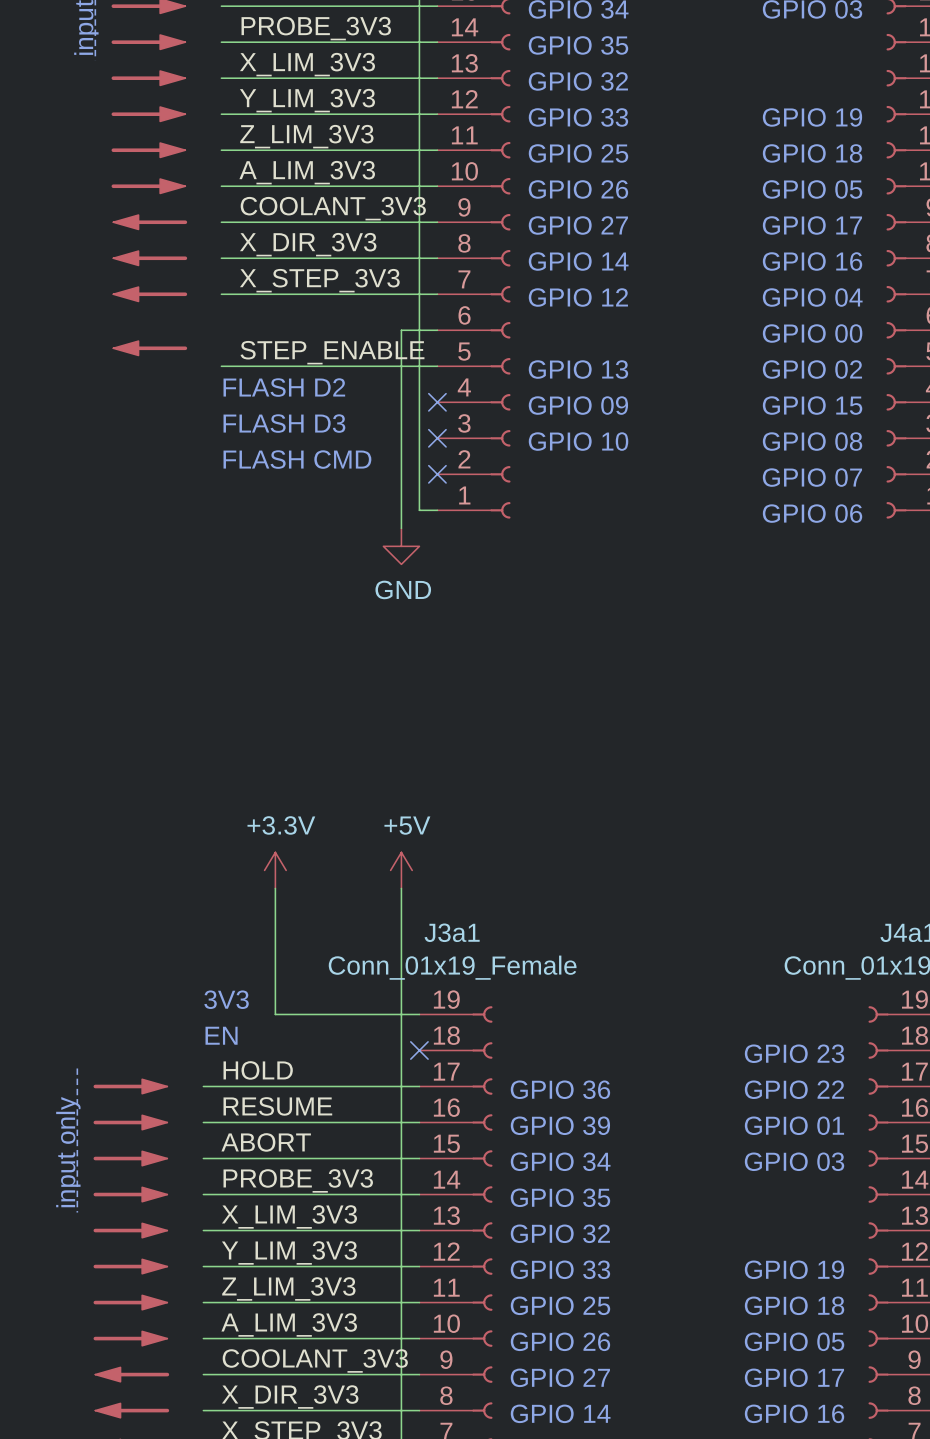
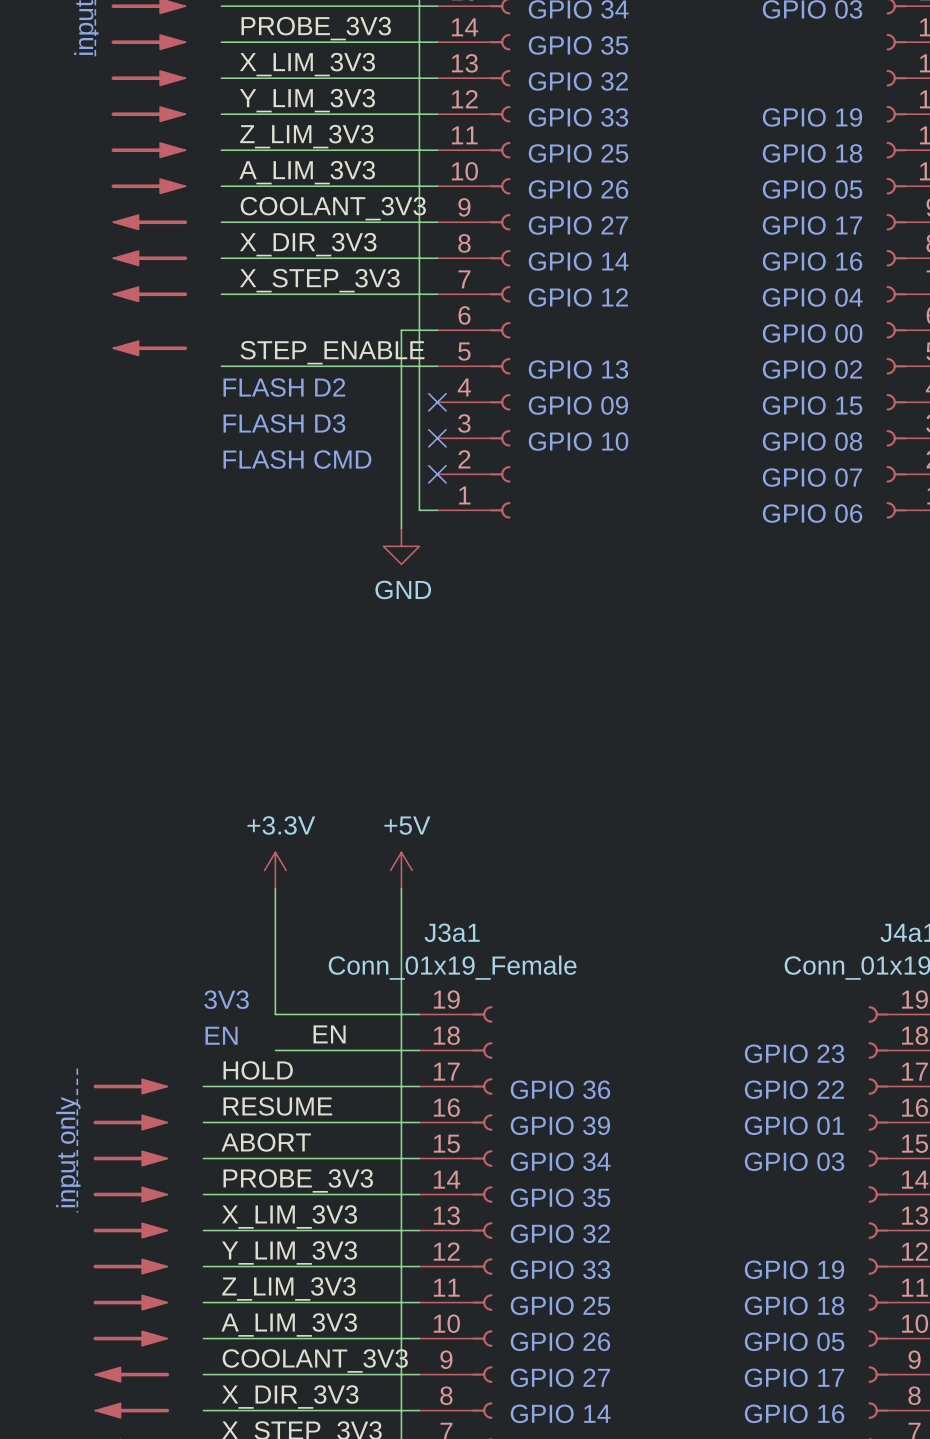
label: none -> EN (329, 1034)
wire: none -> (275, 1050) (419, 1050)
no-connect mark: (419, 1050) -> none

